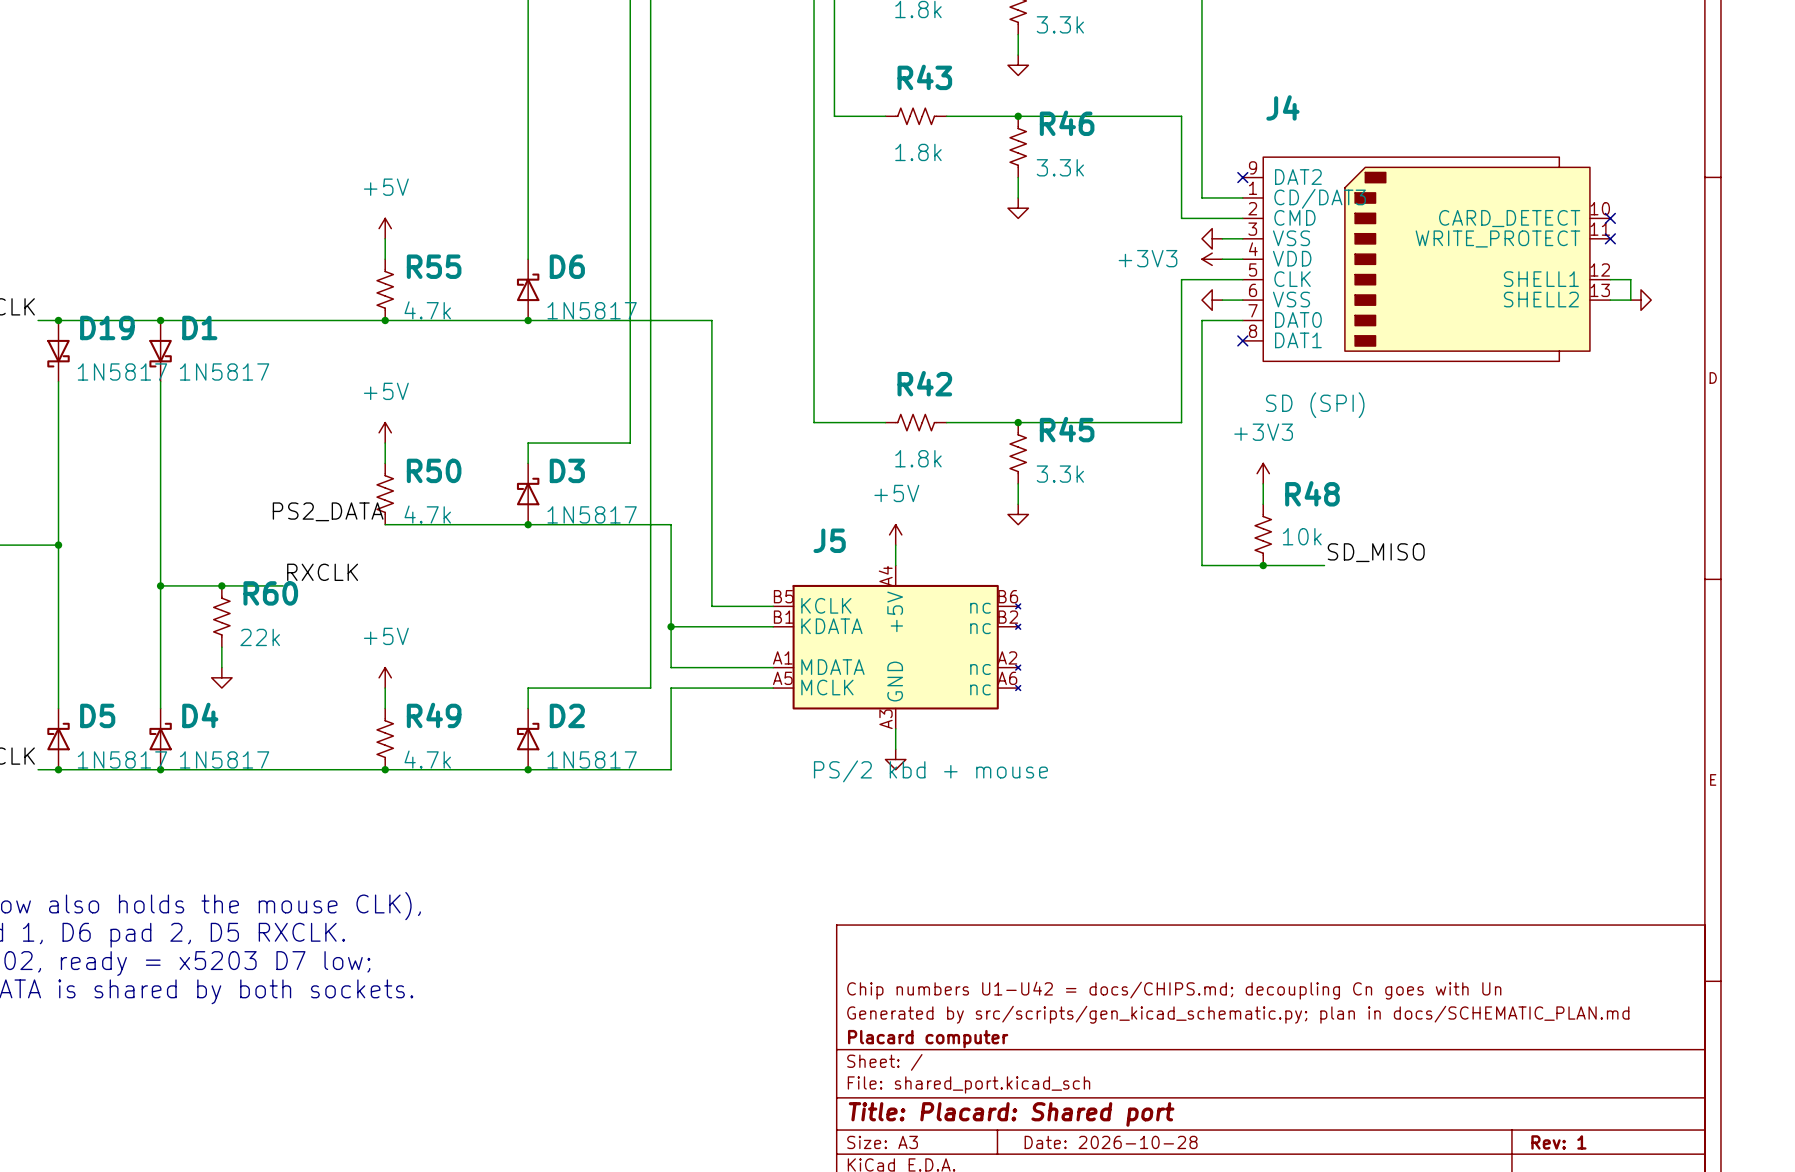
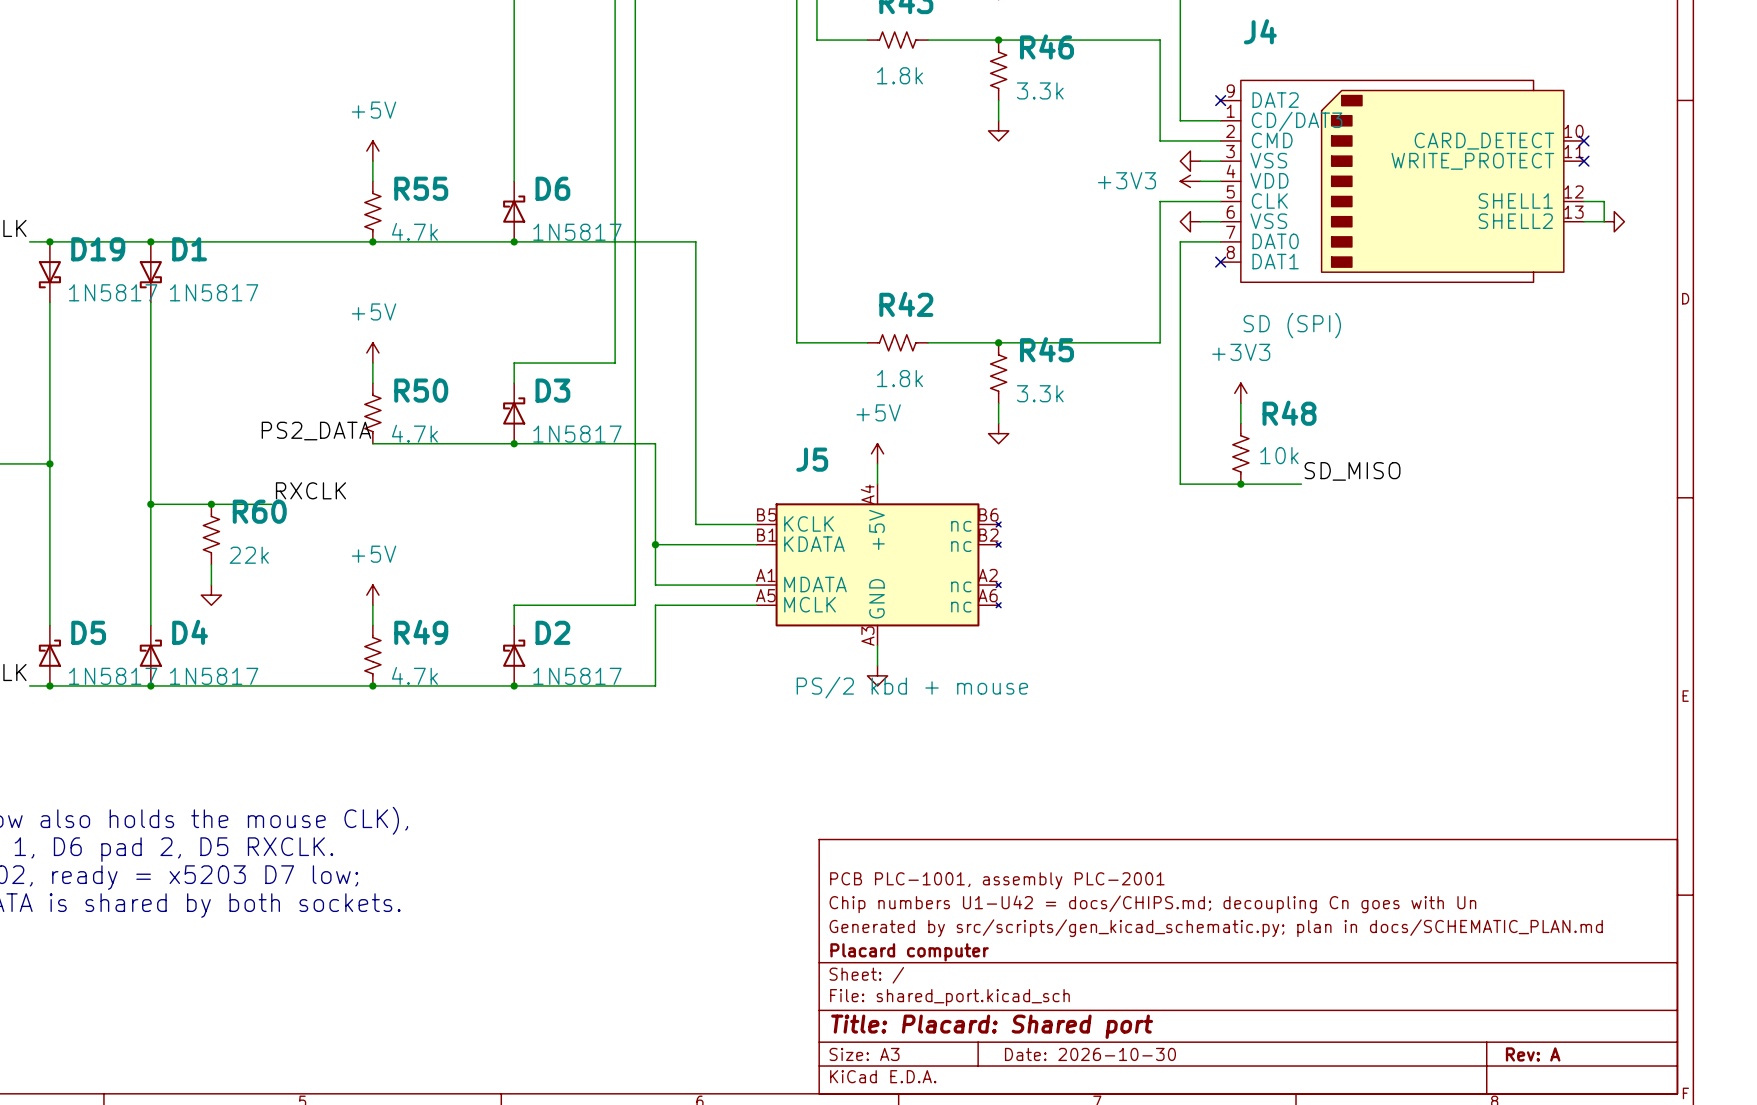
title block: none -> PCB PLC-1001, assembly PLC-2001 (997, 880)
title block: Date: 2026-10-28 (1111, 1142) -> Date: 2026-10-30 (1090, 1054)
title block: Rev: 1 (1558, 1142) -> Rev: A (1533, 1054)

